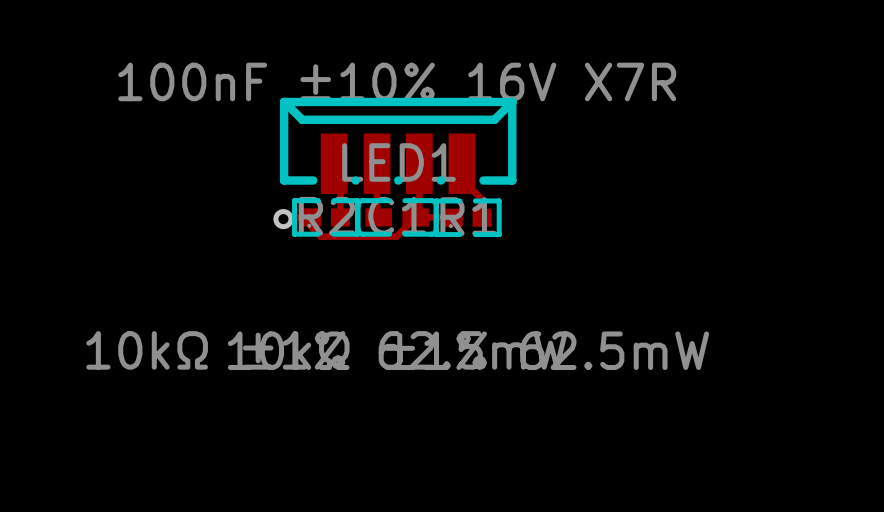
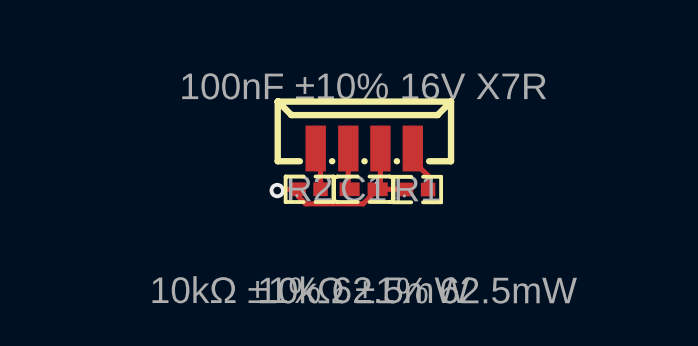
LED1 name: LED1 (399, 162) -> none

